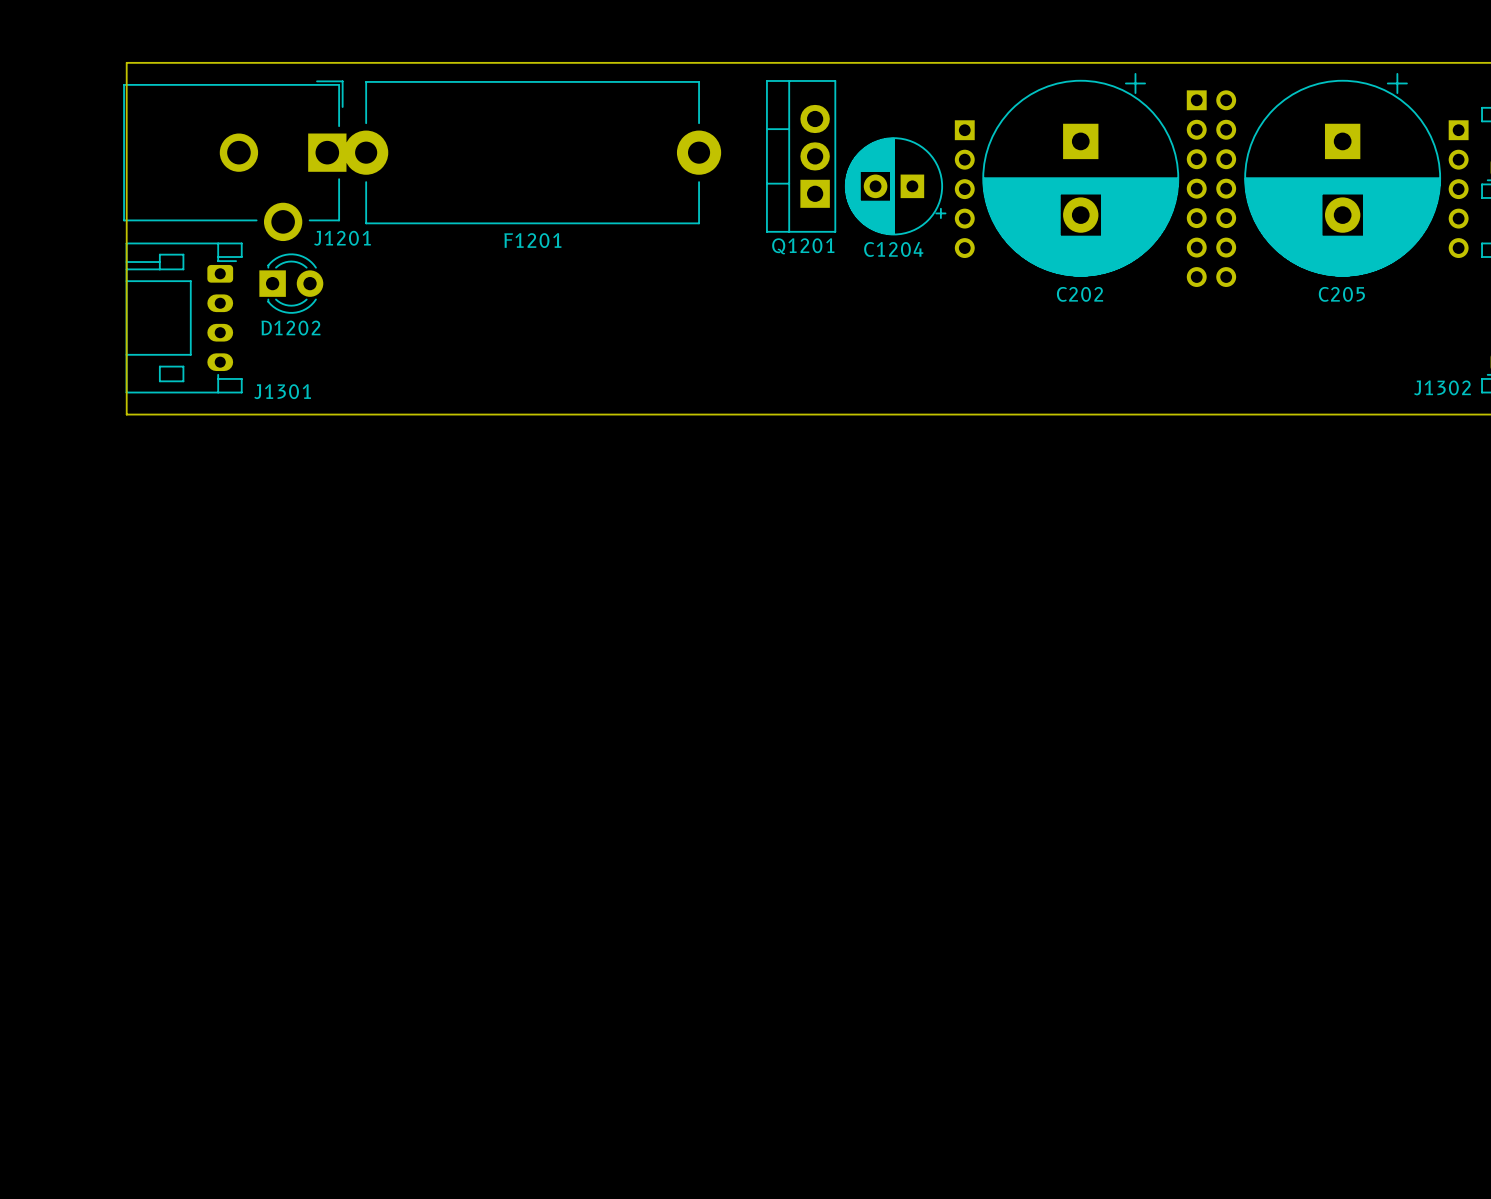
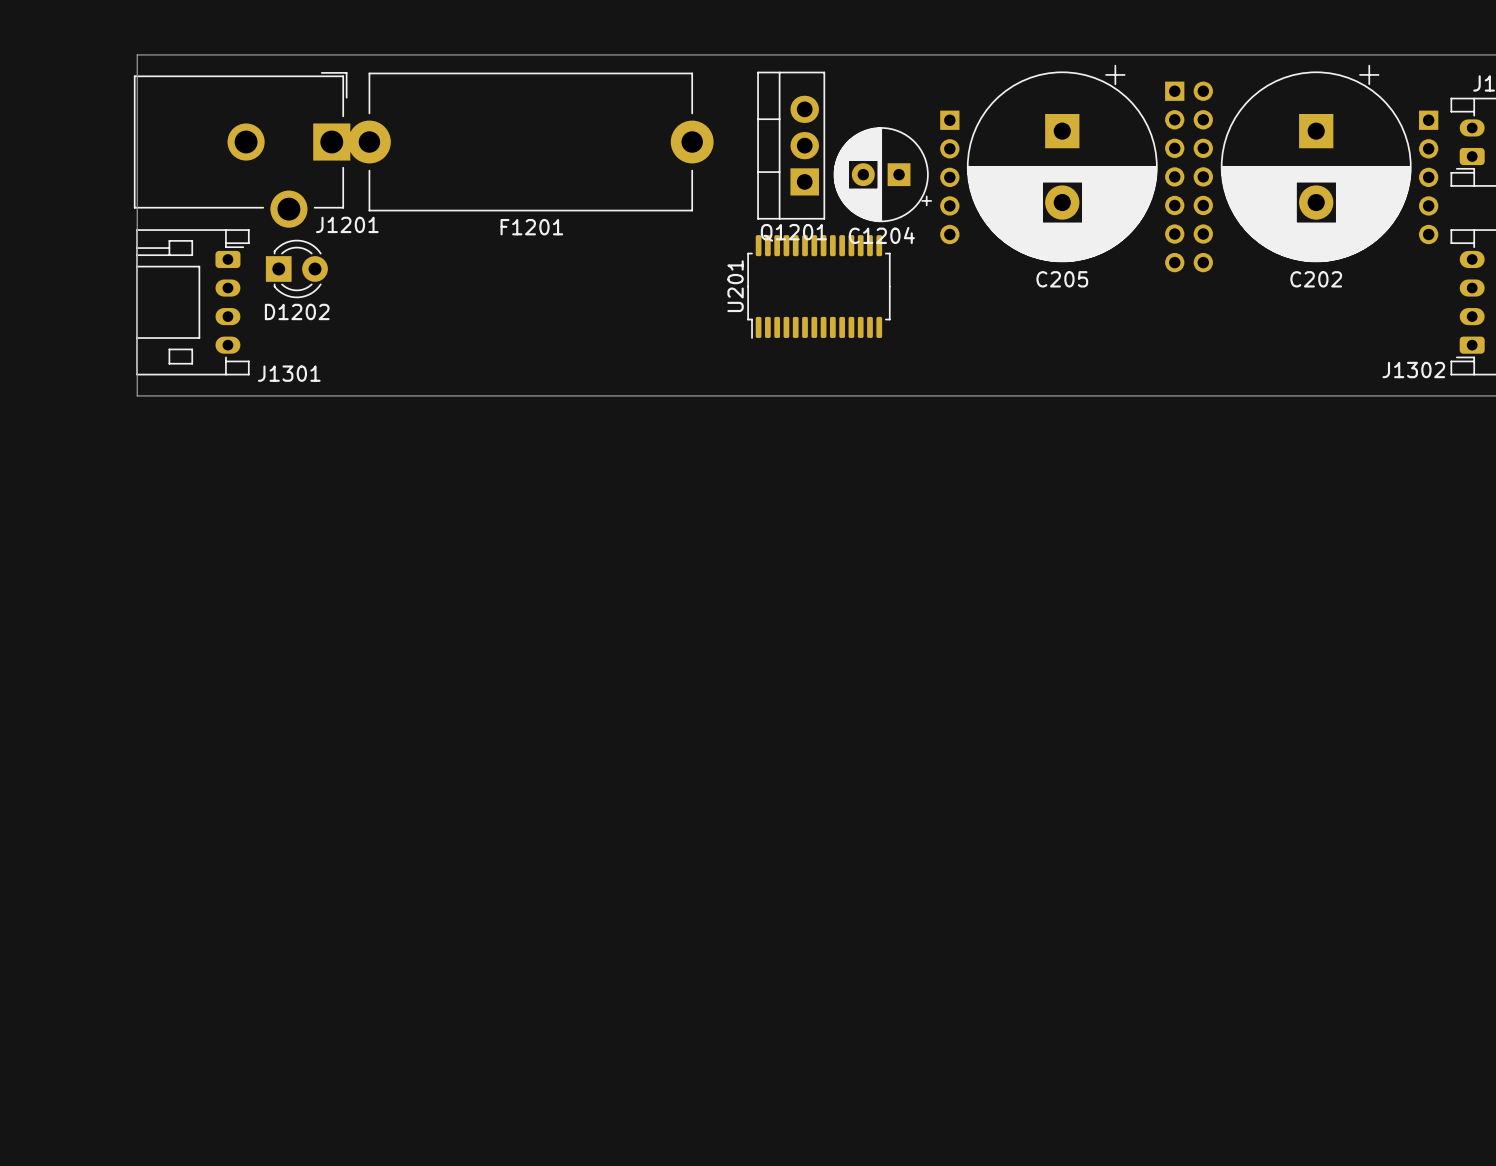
C202 name: C202 (1080, 294) -> C205 (1062, 279)
C205 name: C205 (1341, 294) -> C202 (1316, 279)
U201: none -> (818, 286)

